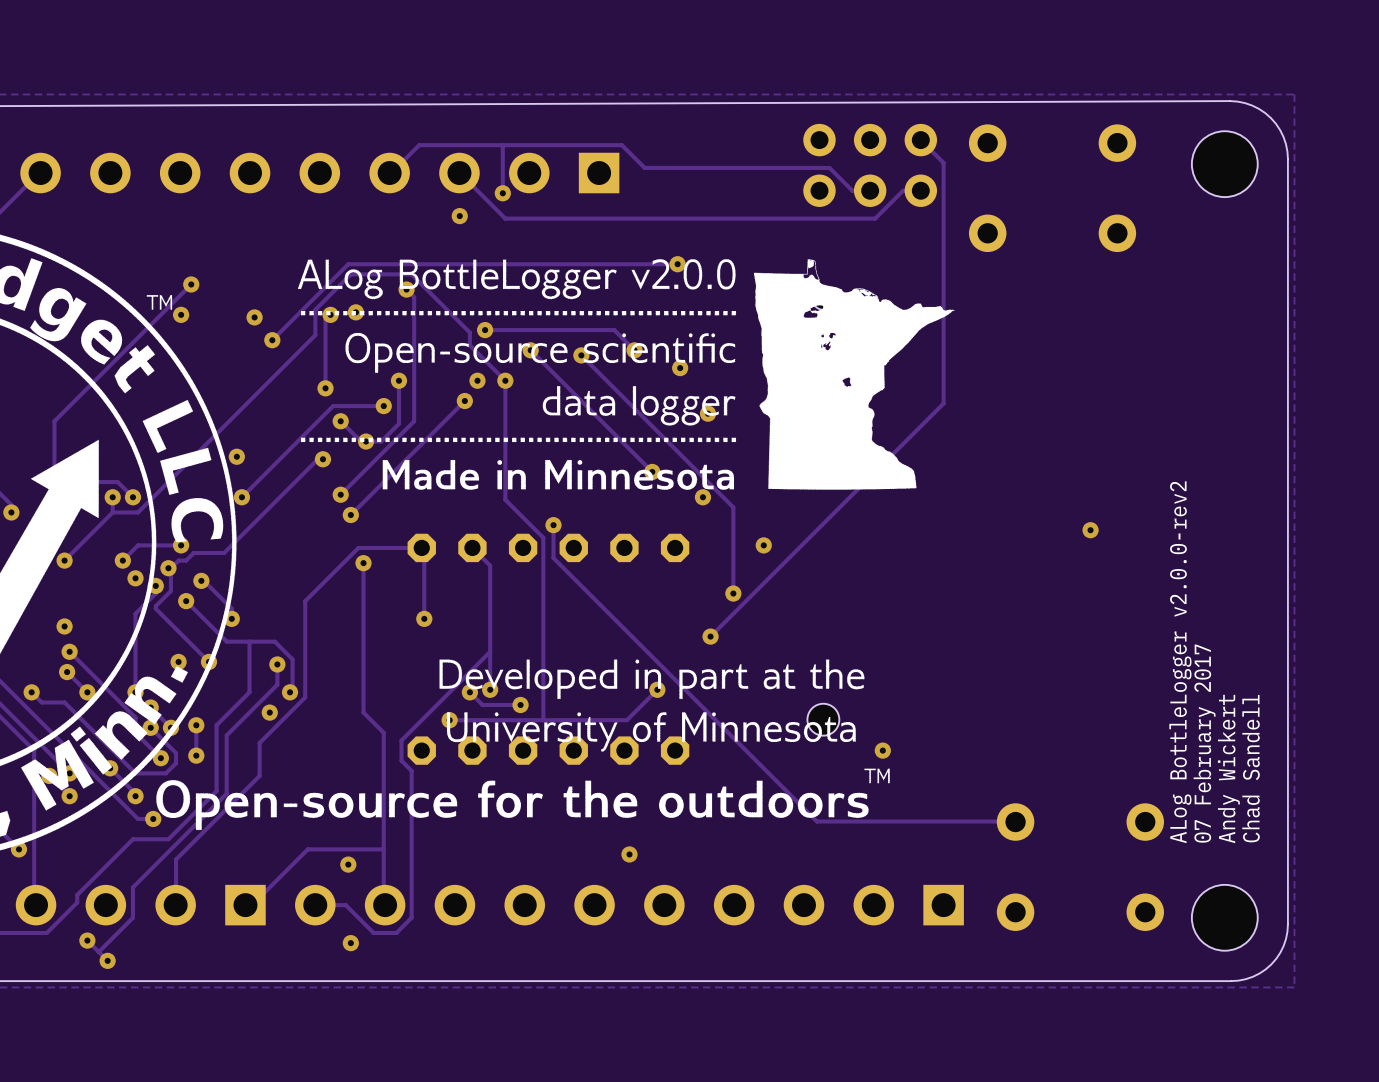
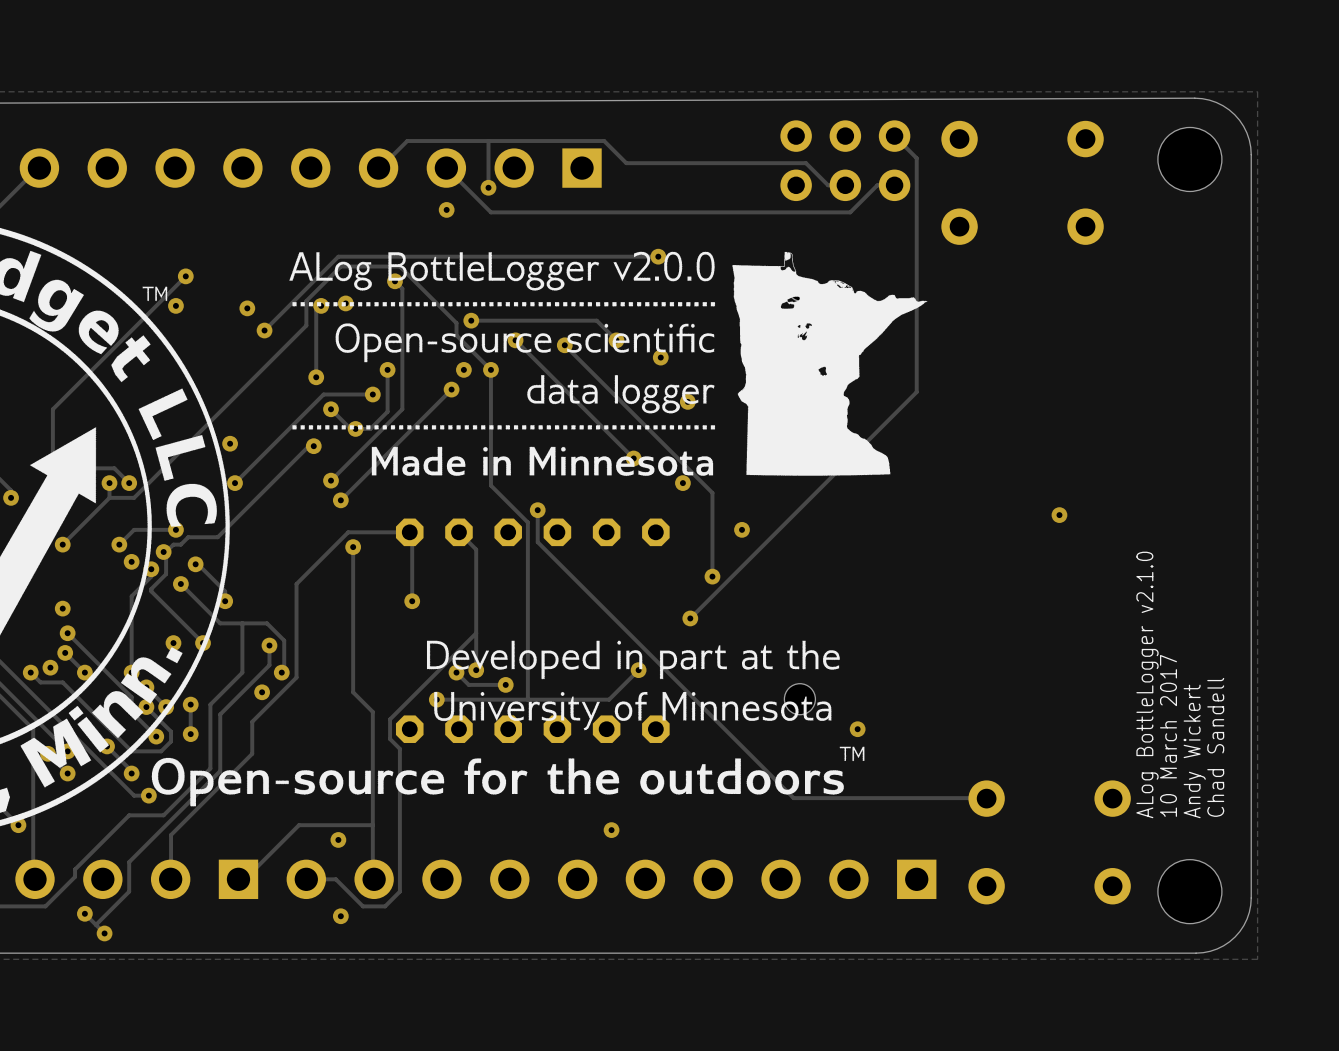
text: ALog BottleLogger v2.0.0-rev2 (1180, 662) -> ALog BottleLogger v2.1.0 (1147, 684)
via: none -> (50, 667)
text: 07 February 2017 (1204, 743) -> 10 March 2017 (1168, 735)

